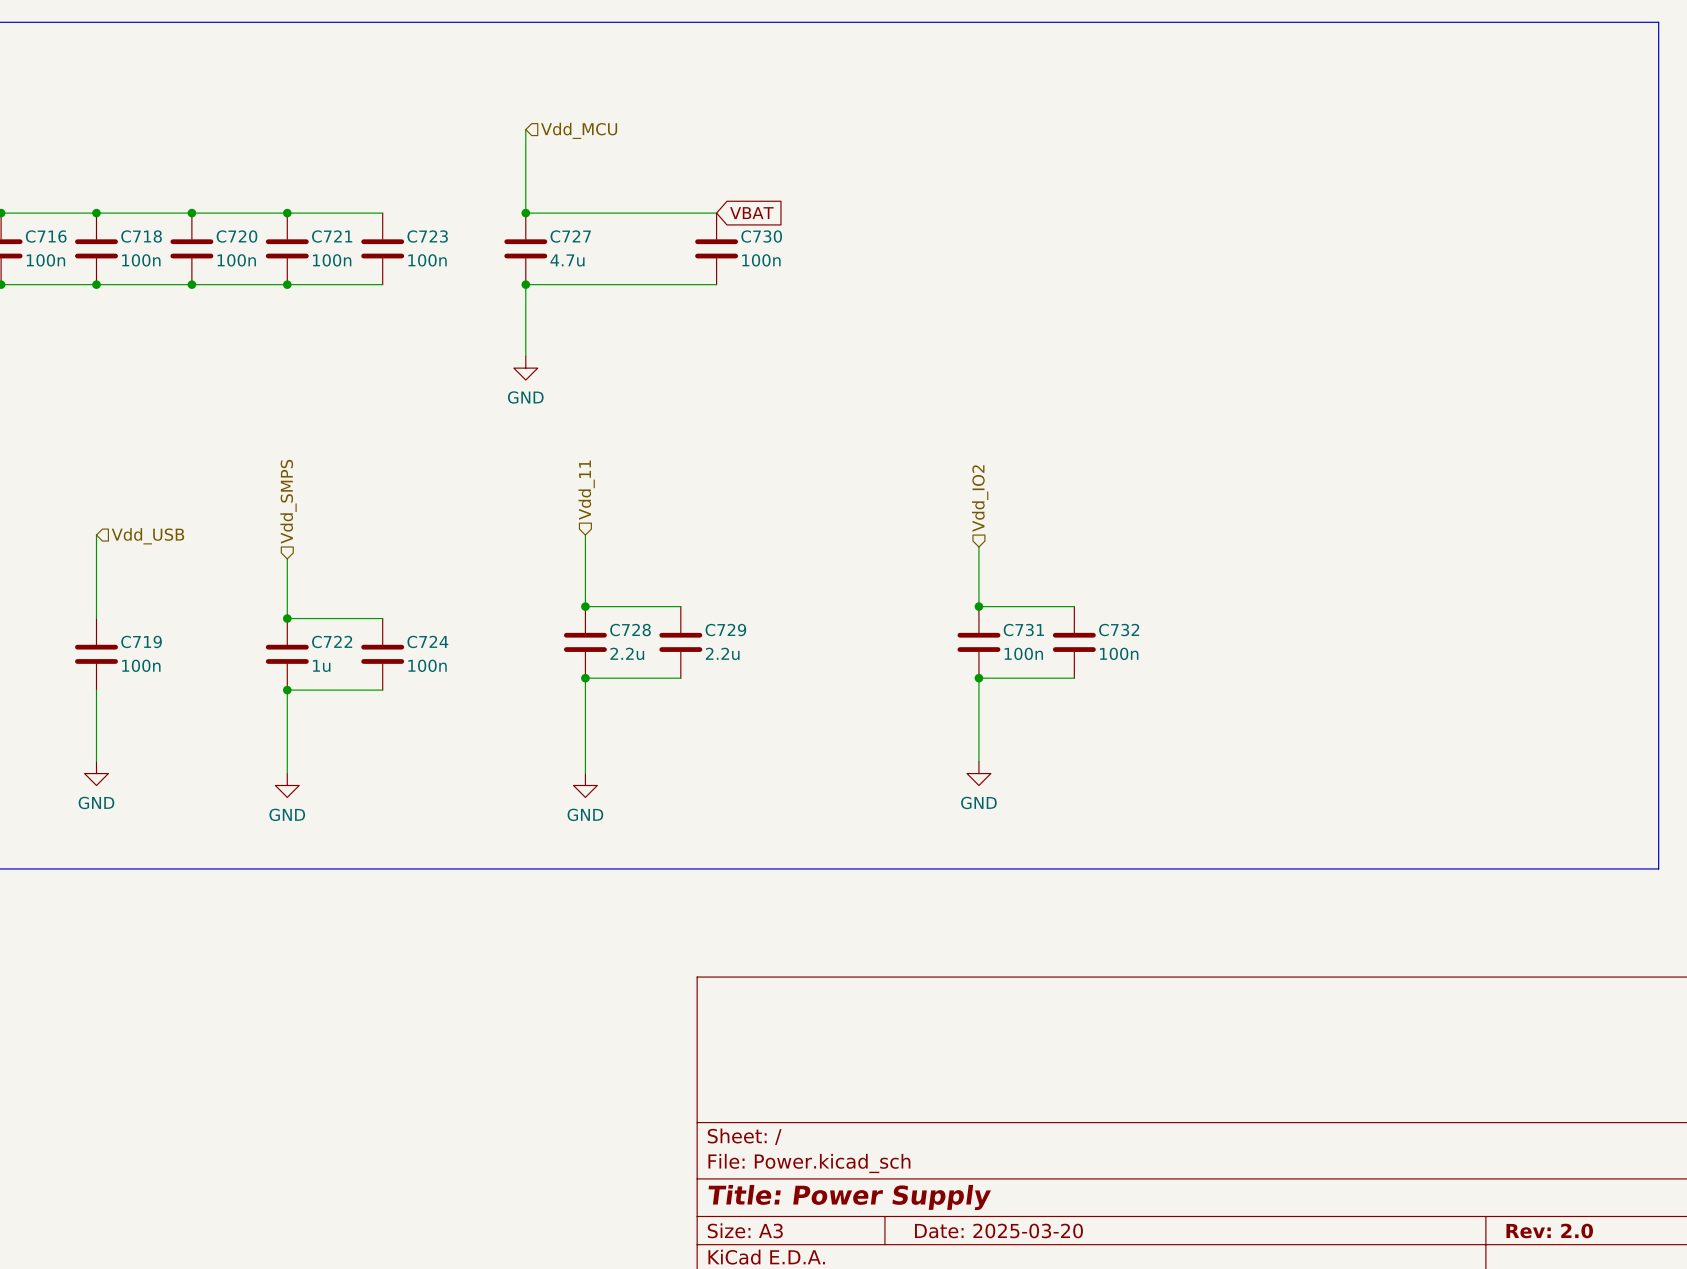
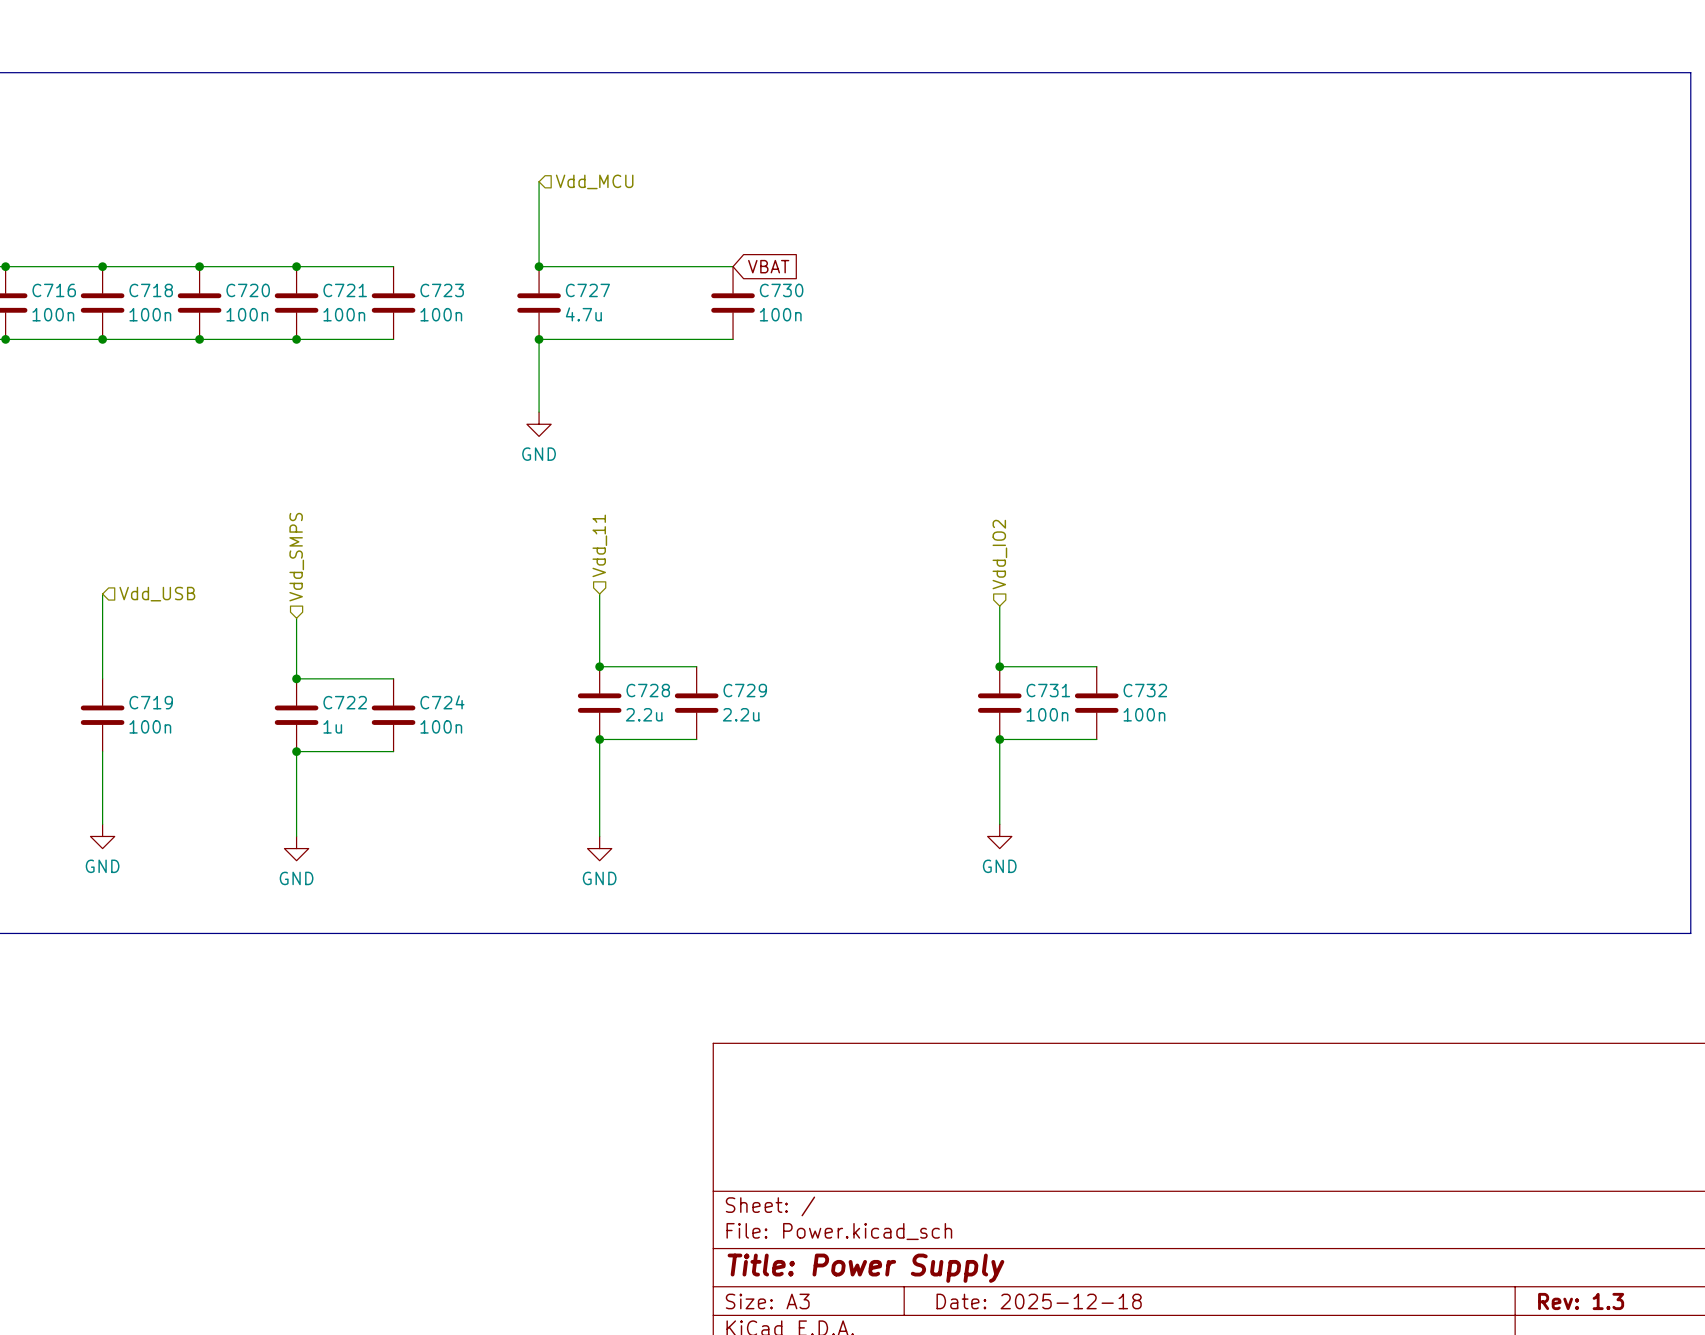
title block: Date: 2025-03-20 (998, 1230) -> Date: 2025-12-18 (1039, 1301)
title block: Rev: 2.0 (1549, 1230) -> Rev: 1.3 (1581, 1301)

